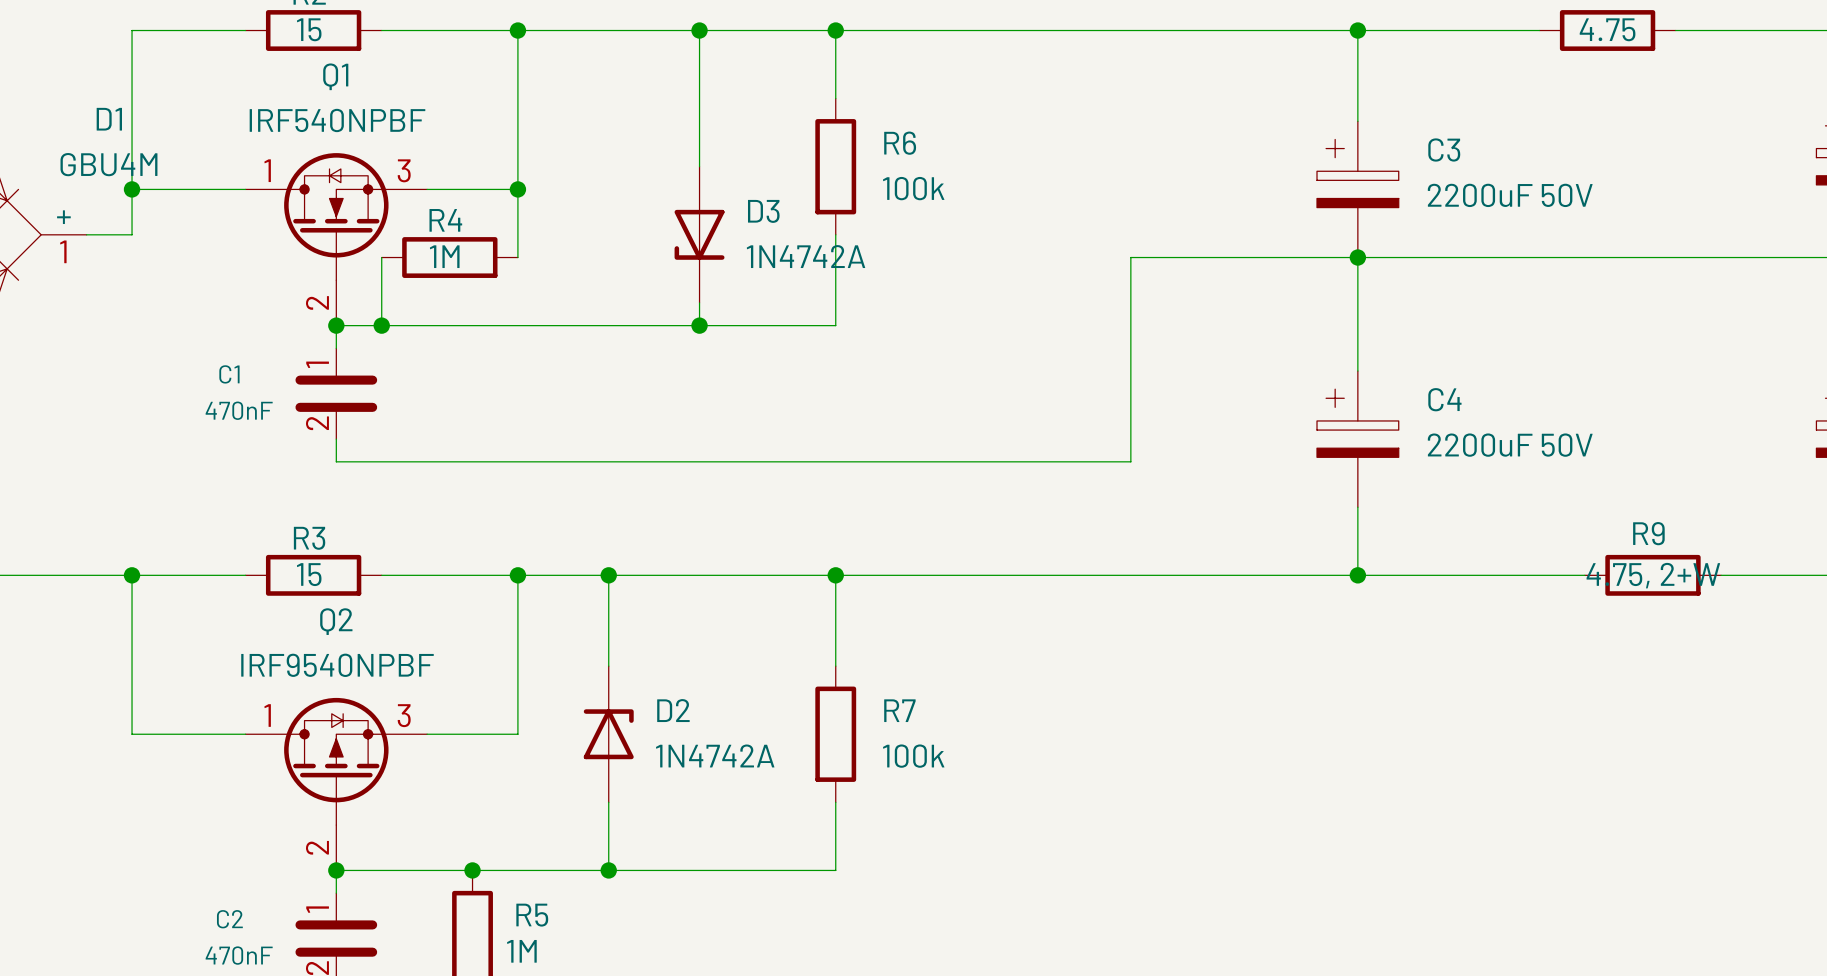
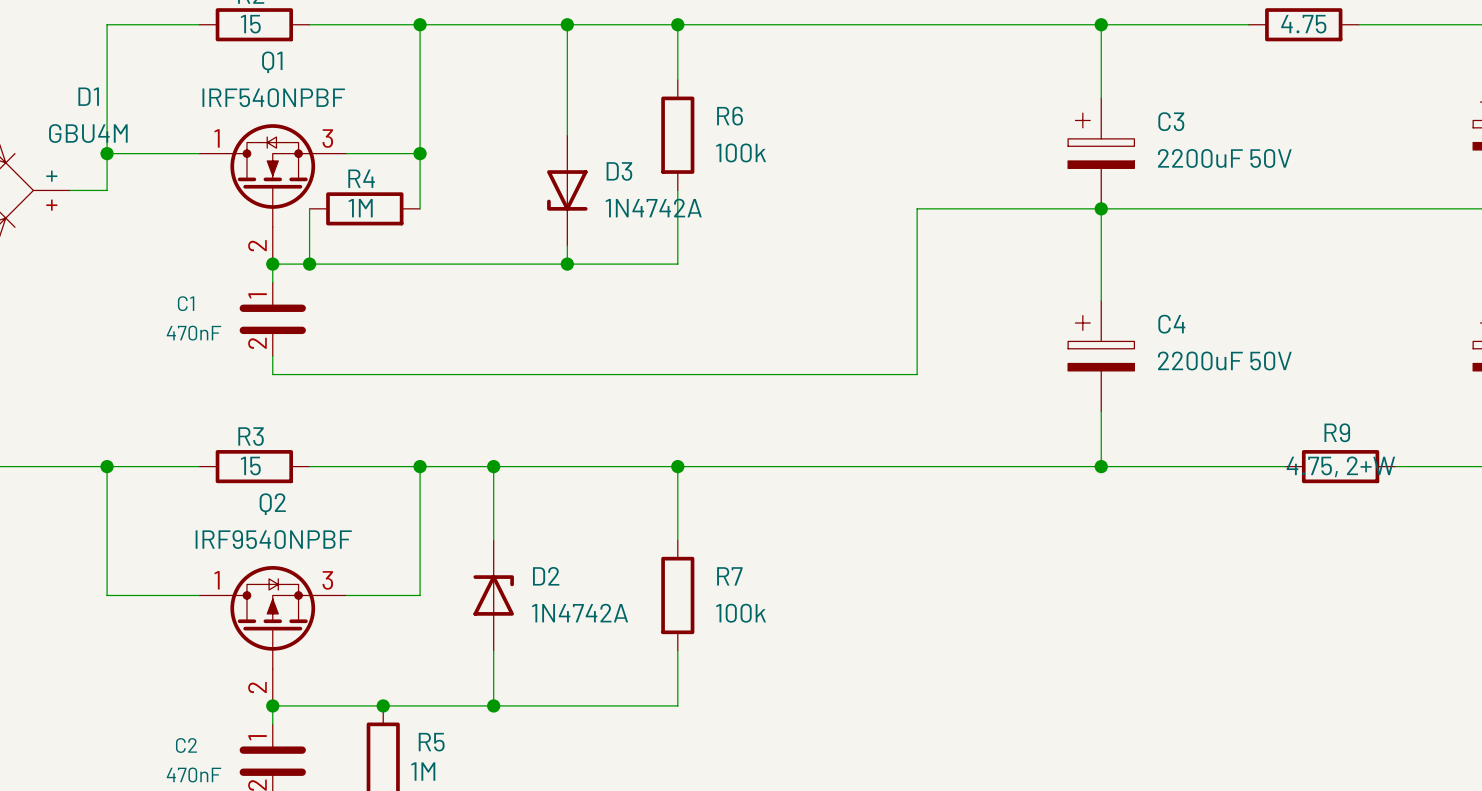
D1 pin number: 1 (63, 251) -> + (51, 205)

